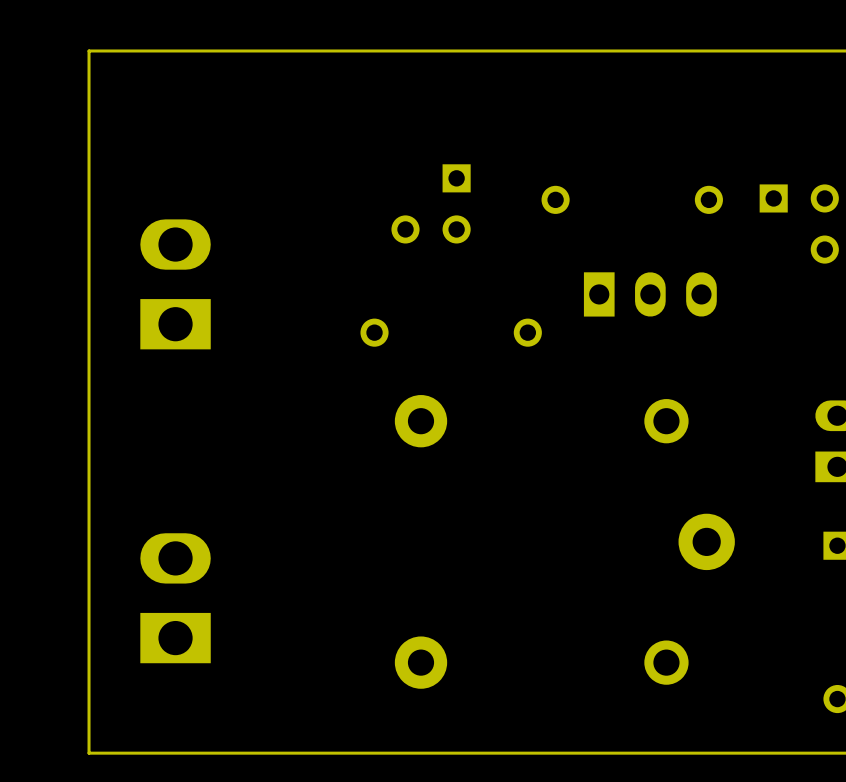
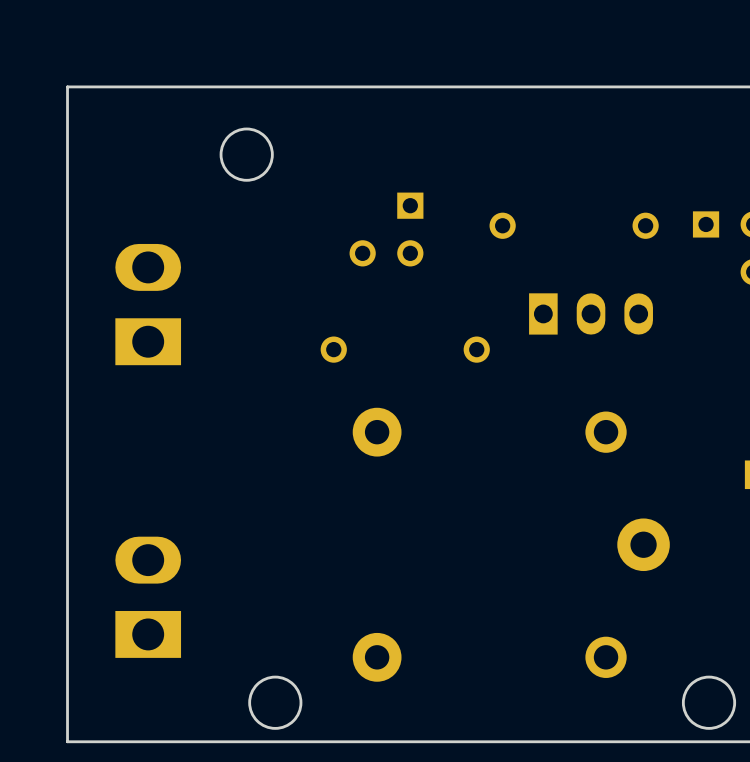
round board edge: none -> [219, 127, 274, 182]
round board edge: none -> [248, 675, 303, 730]
round board edge: none -> [681, 675, 737, 730]

